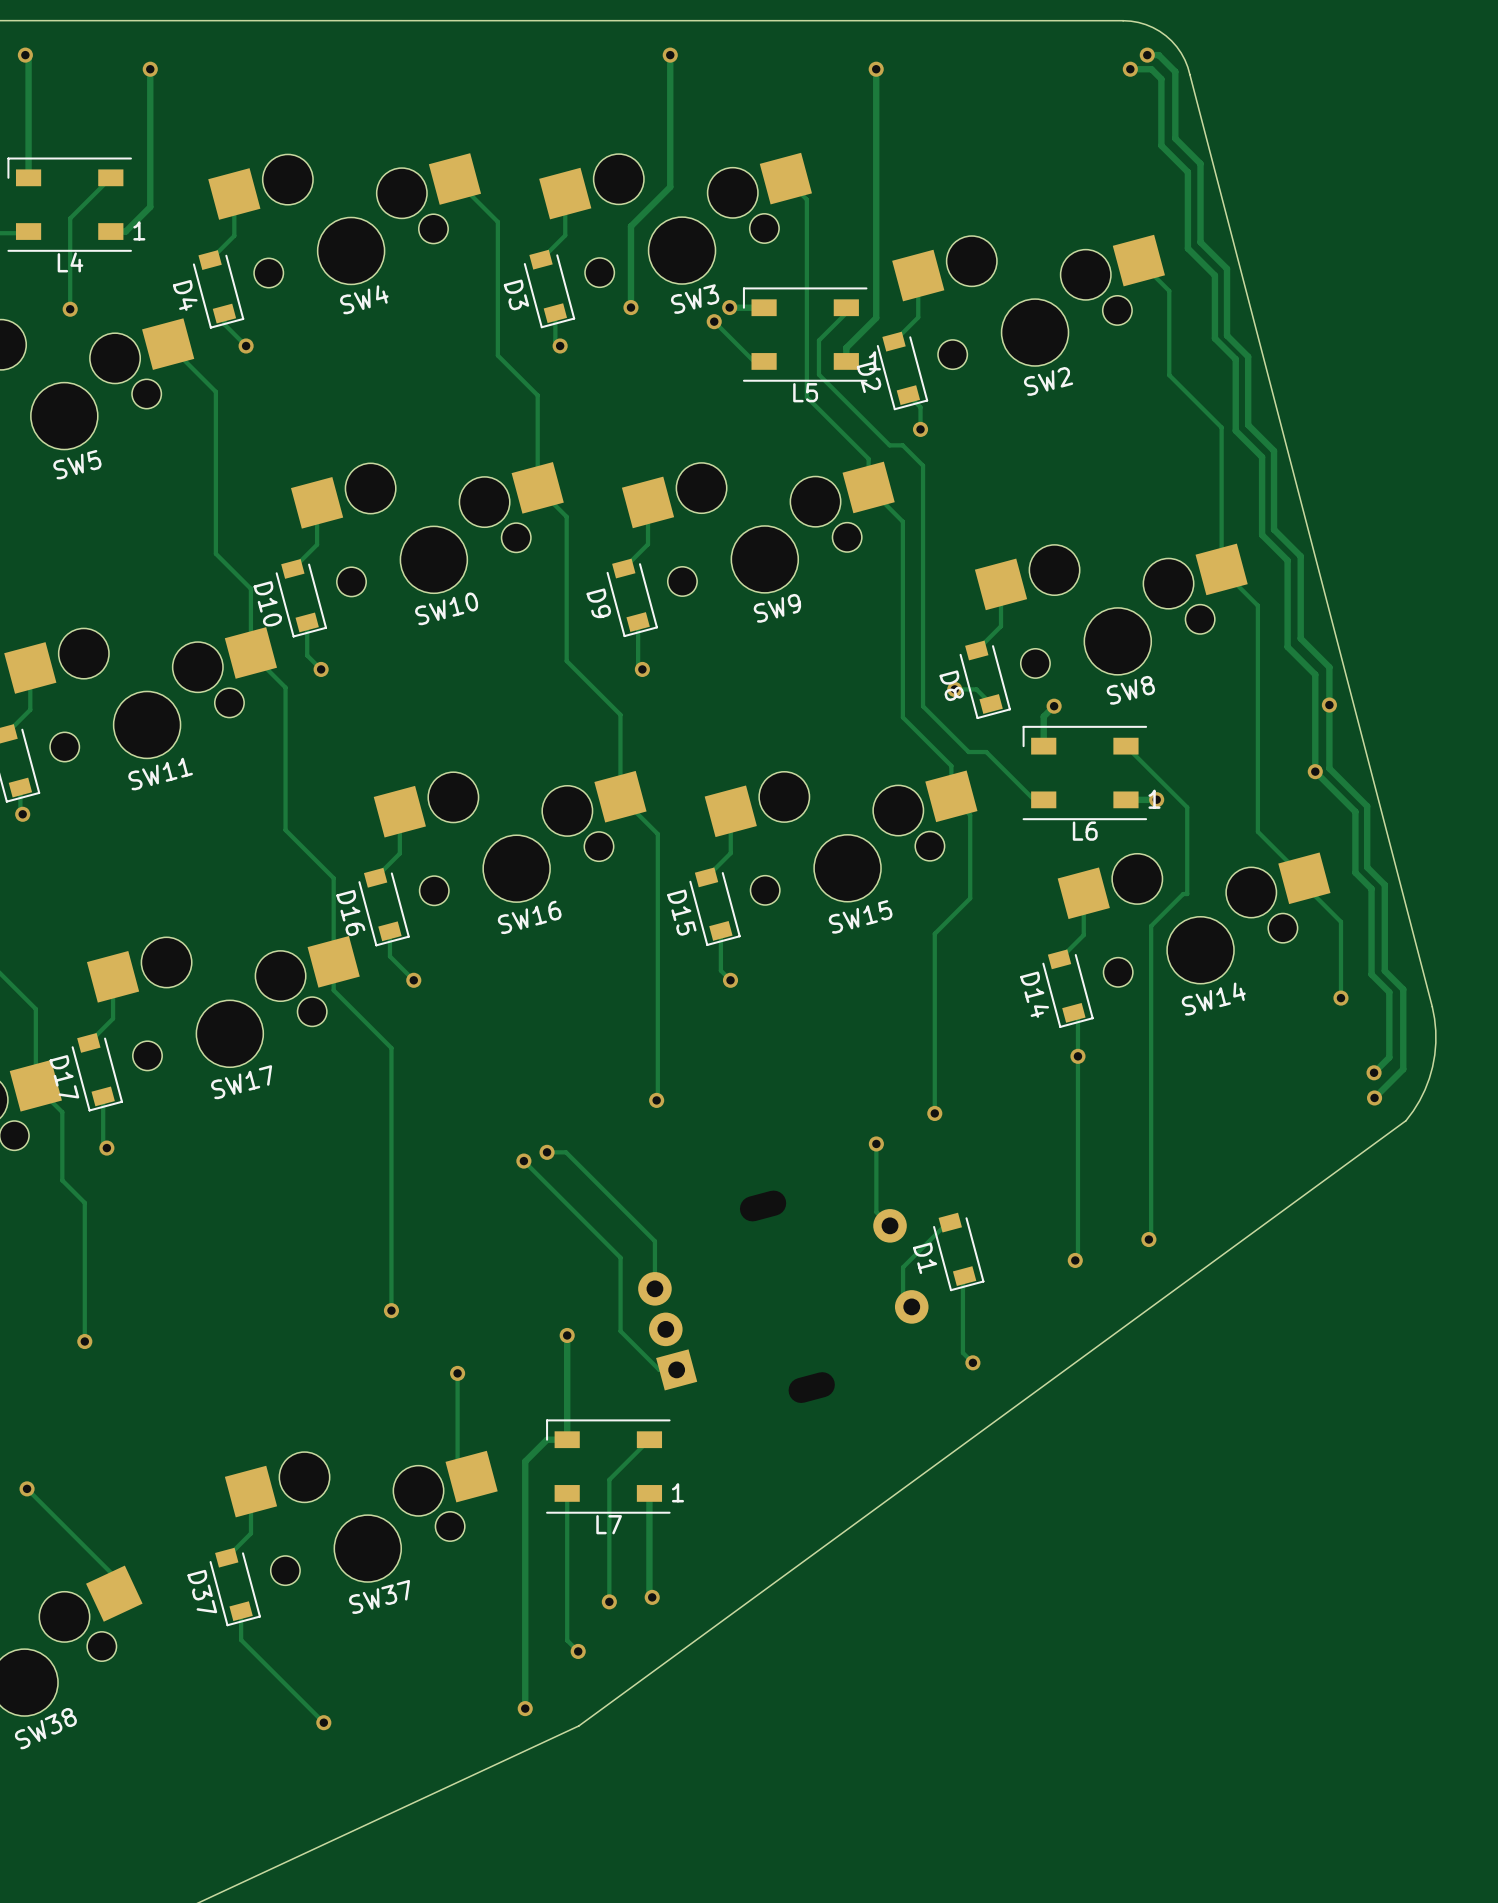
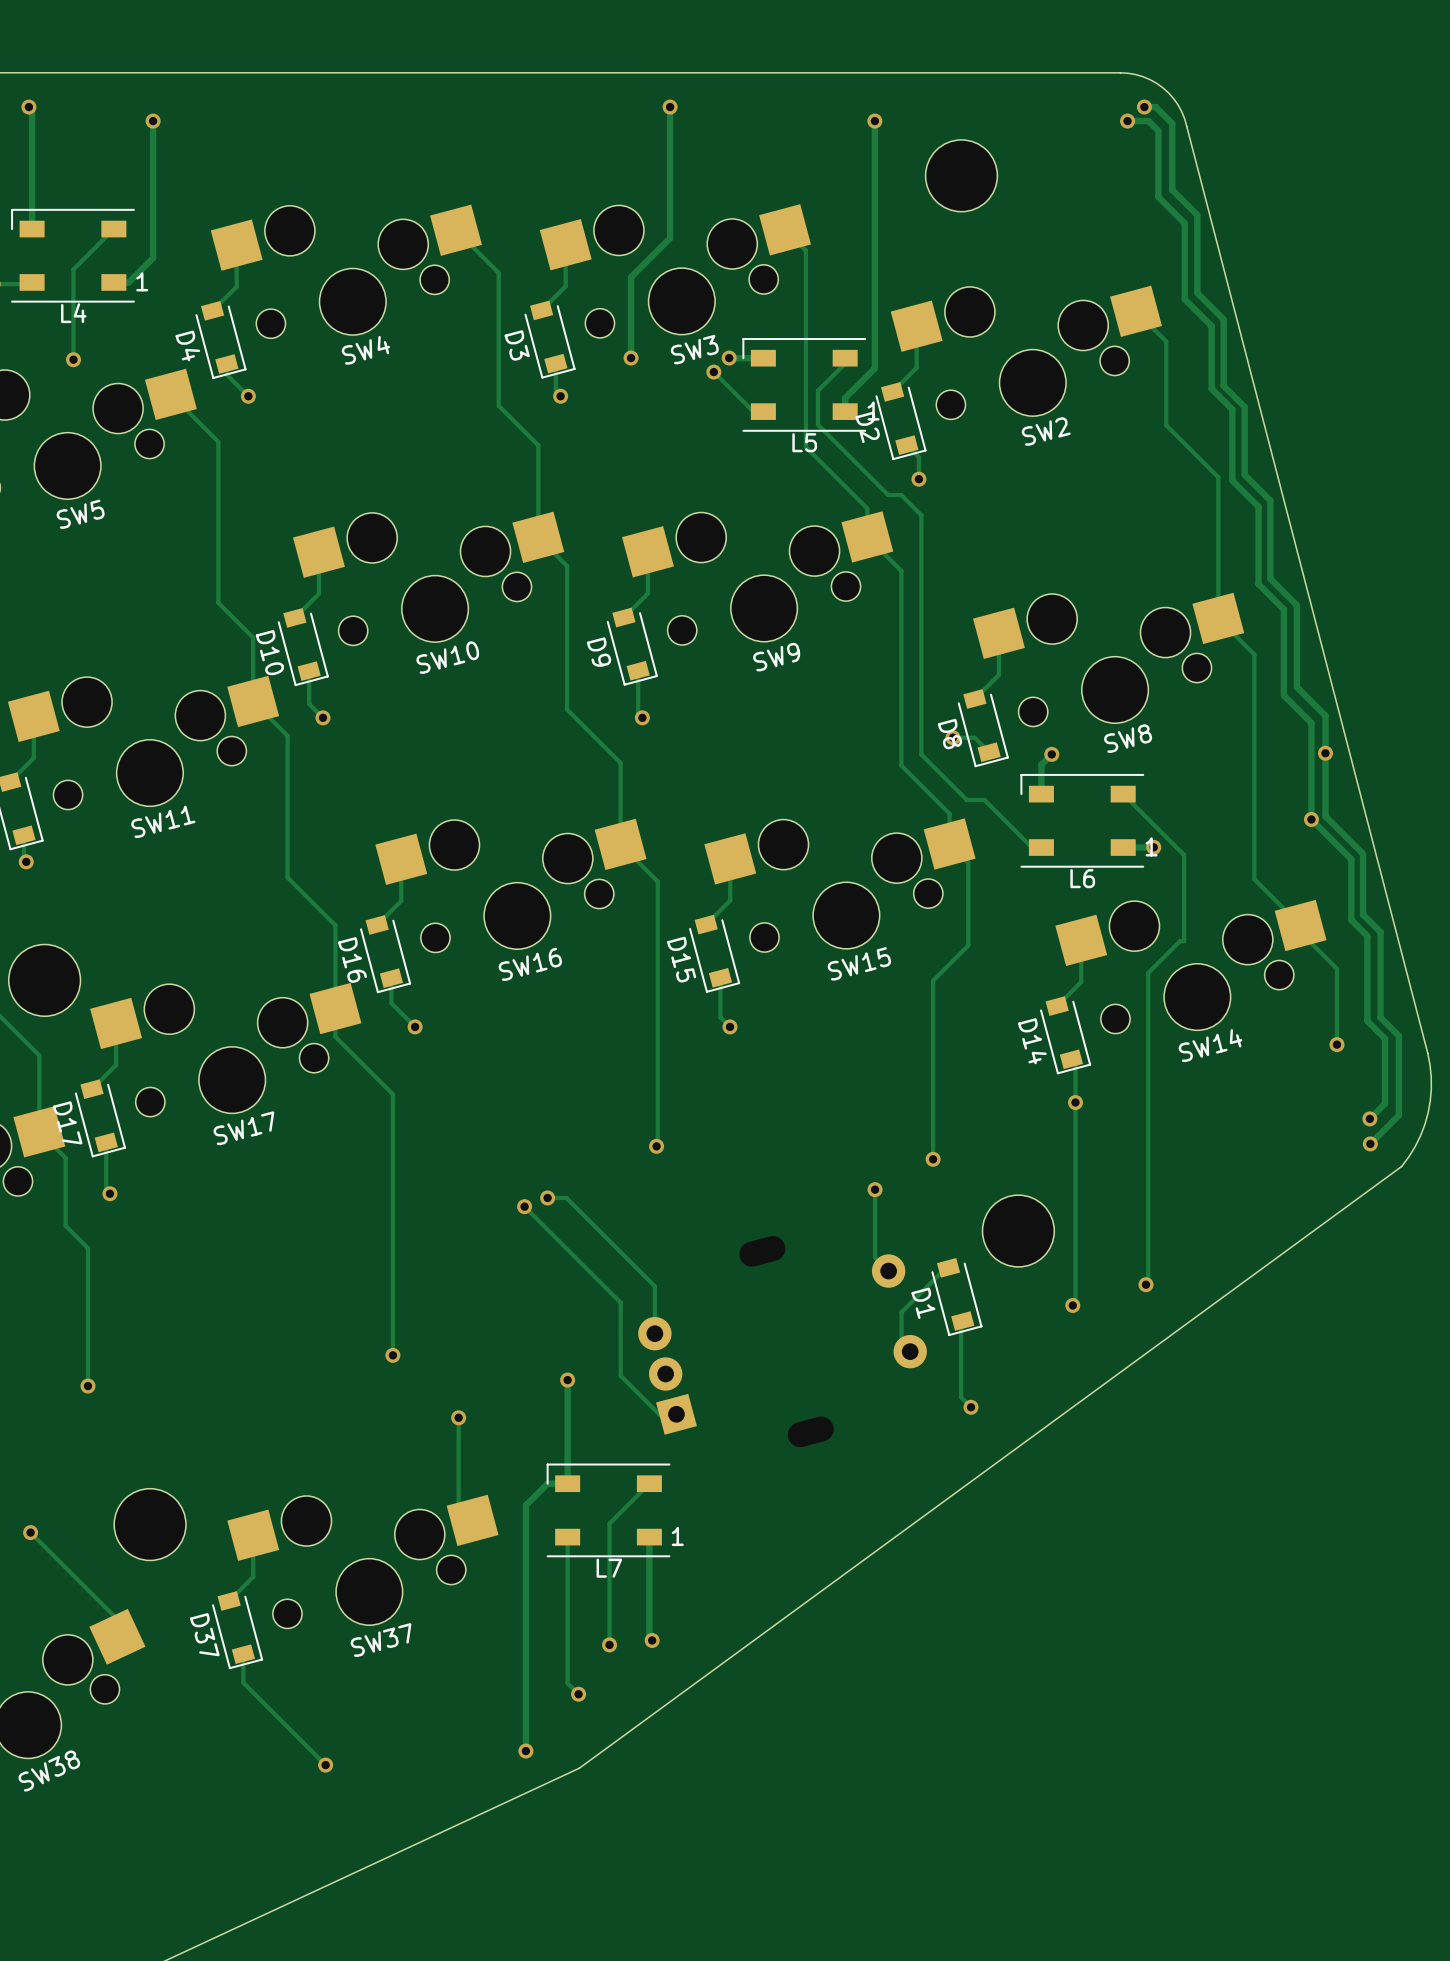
part: none -> (961, 175)
part: none -> (44, 980)
part: none -> (1018, 1231)
part: none -> (150, 1524)

